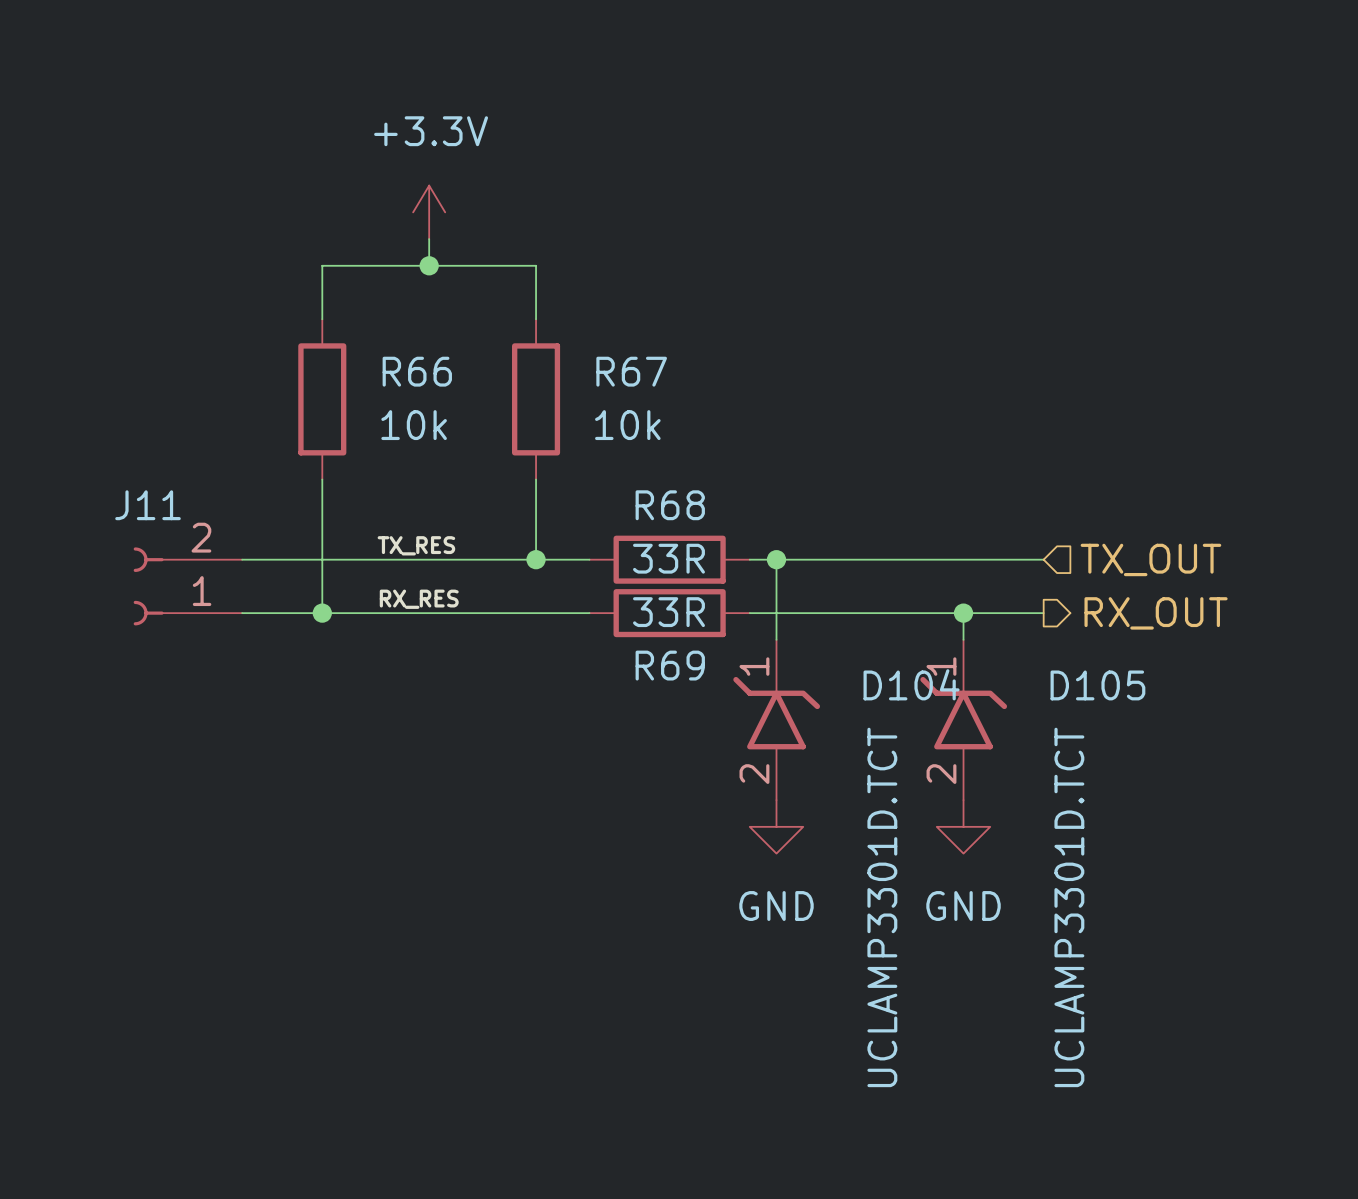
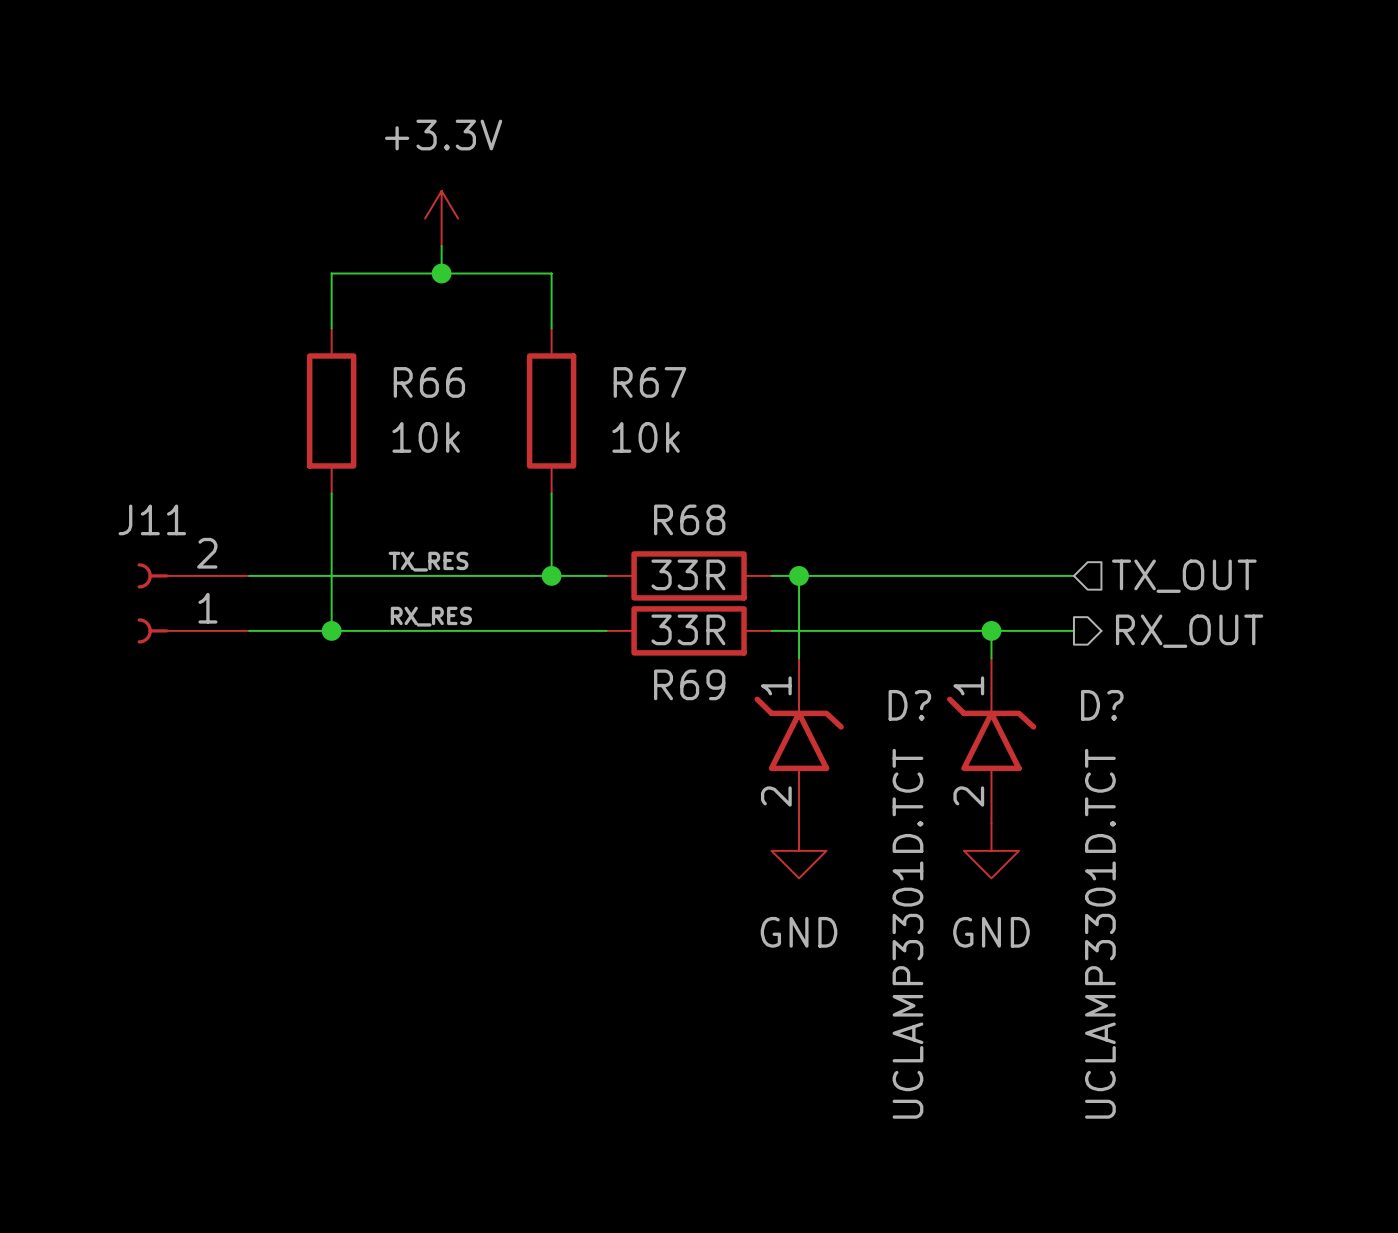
D104 name: D104 (911, 684) -> D? (909, 705)
D105 name: D105 (1097, 685) -> D? (1102, 705)

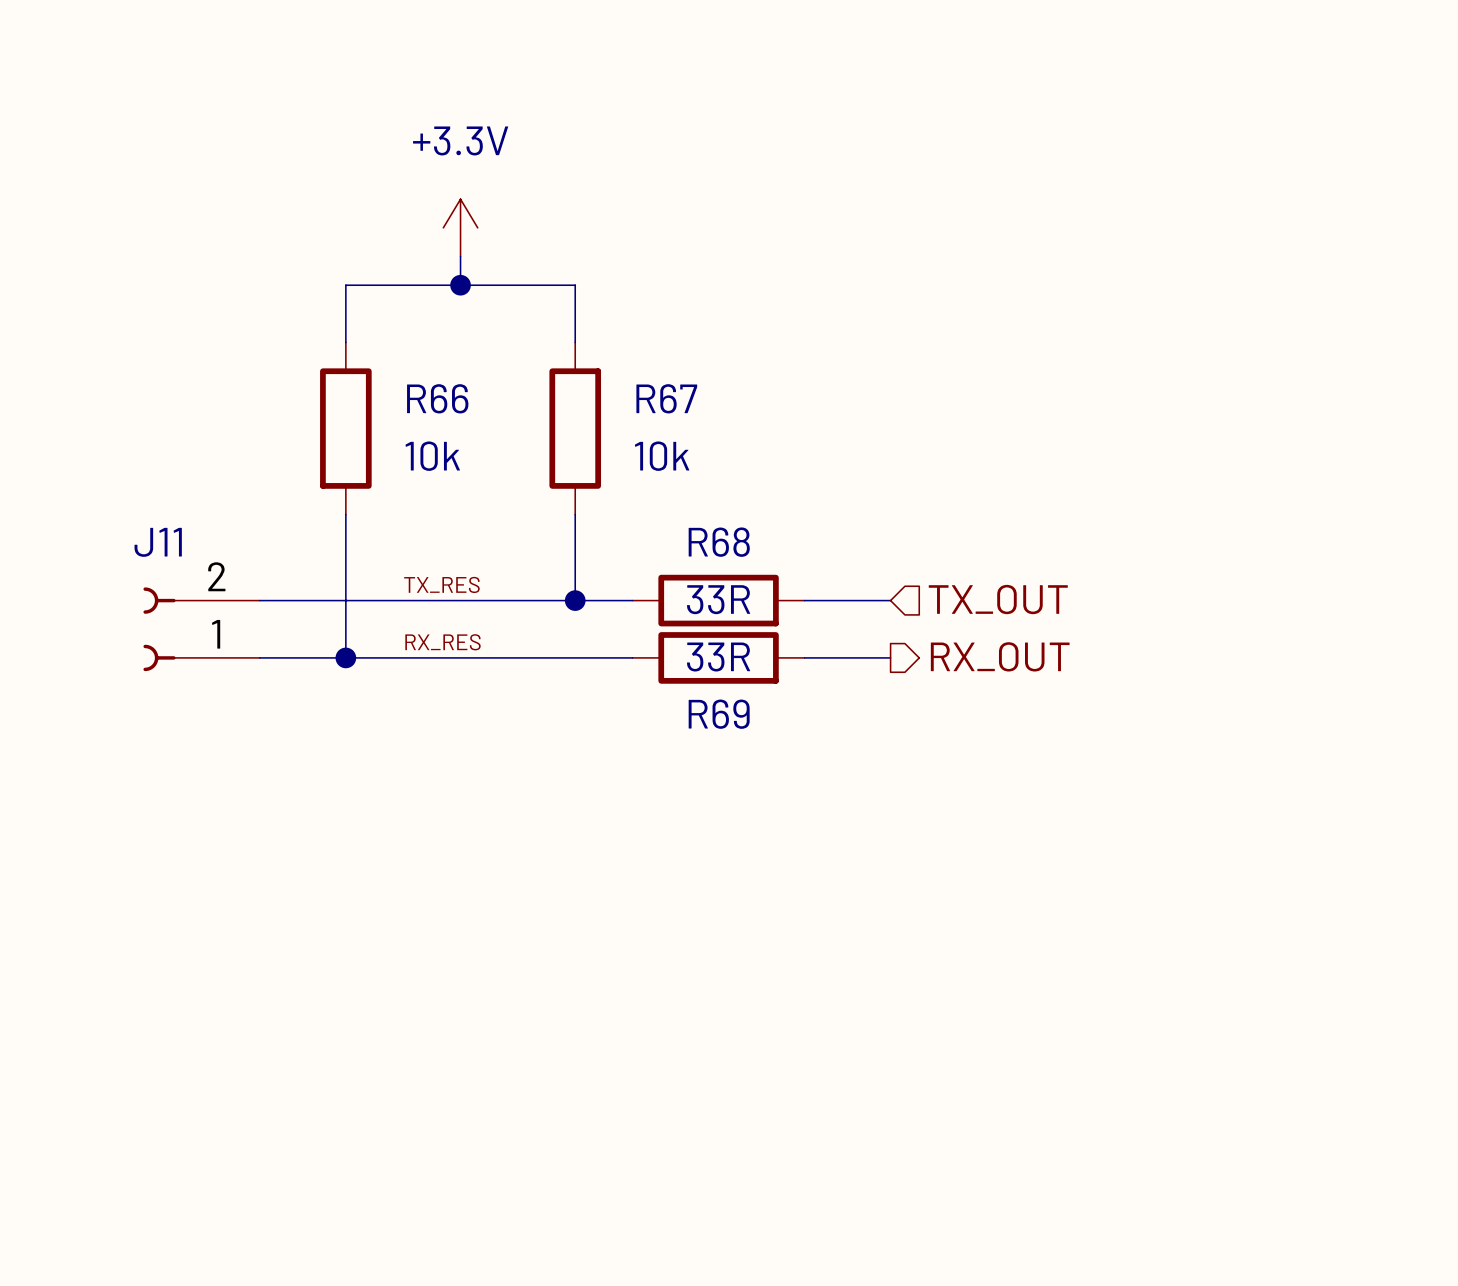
wire: (799, 575) (799, 658) -> none
junction: (799, 575) -> none
wire: (854, 575) (1073, 575) -> none
hierarchical label position: TX_OUT (1184, 576) -> TX_OUT (998, 599)
wire: (854, 630) (1073, 630) -> none
wire: (991, 630) (991, 658) -> none
junction: (991, 630) -> none
hierarchical label position: RX_OUT (1189, 631) -> RX_OUT (1000, 656)
D?: UCLAMP3301D.TCT (799, 740) -> none
D?: UCLAMP3301D.TCT (991, 740) -> none
power symbol: GND (799, 850) -> none
power symbol: GND (991, 850) -> none

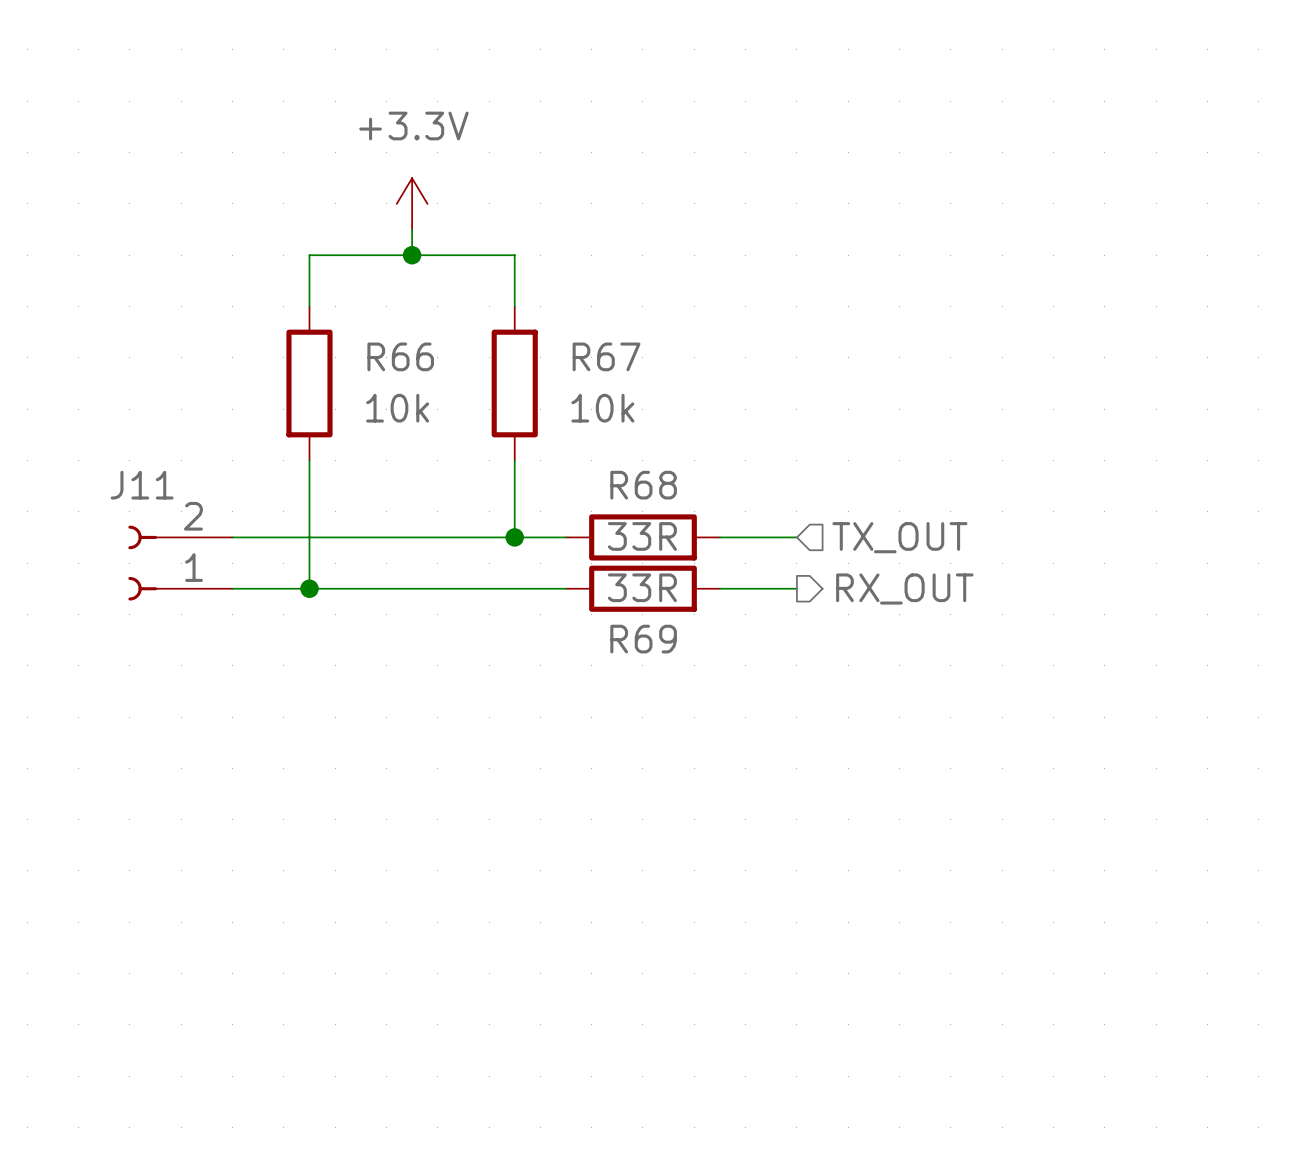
label: TX_RES (441, 584) -> none
label: RX_RES (443, 642) -> none

